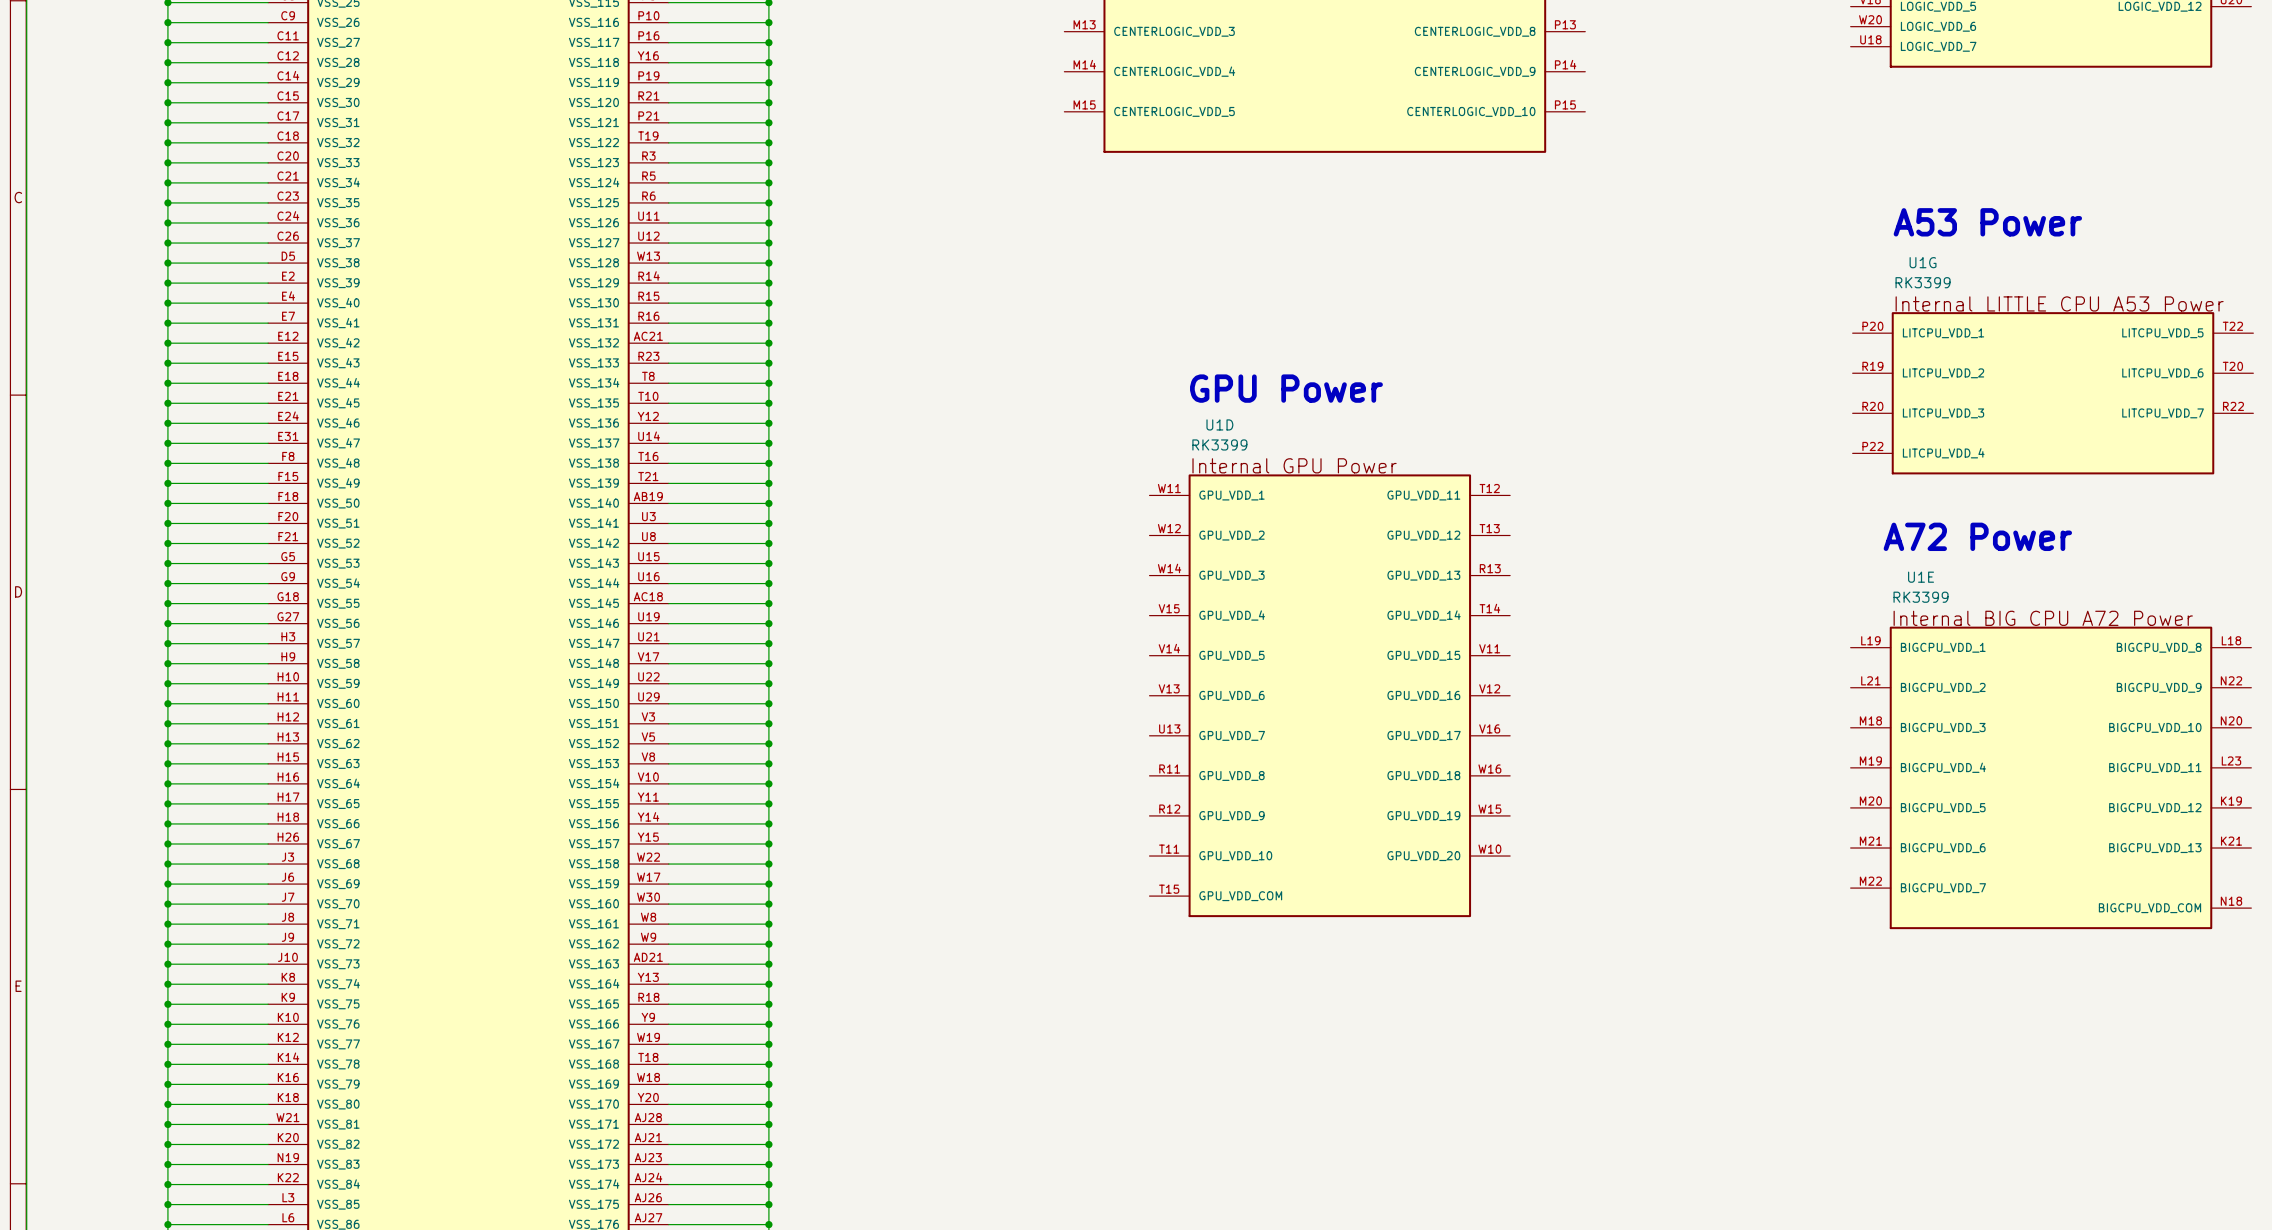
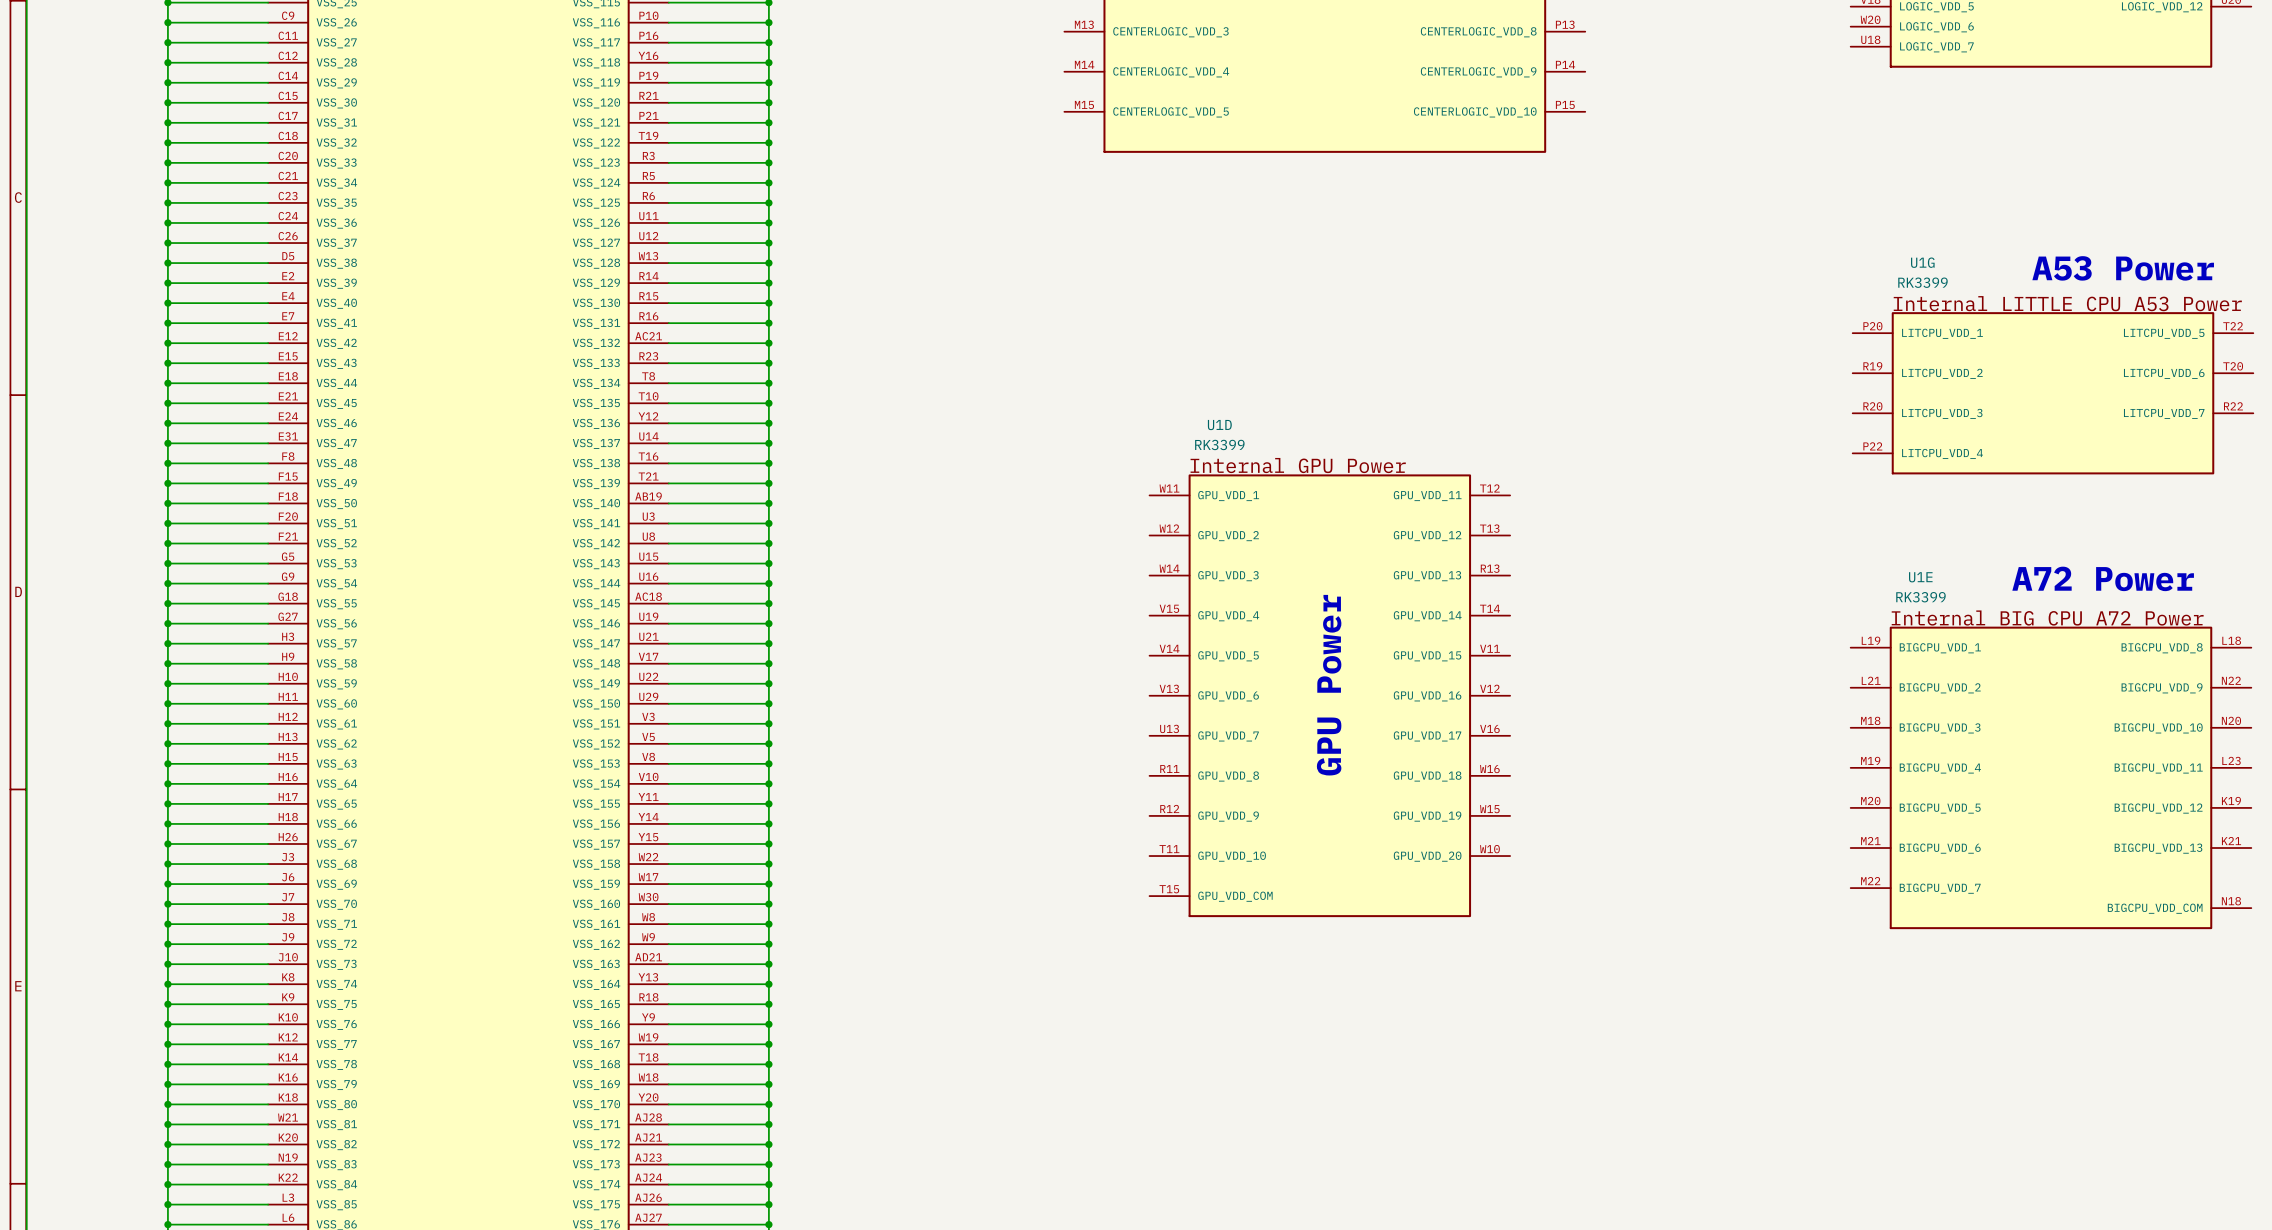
text position: A53 Power (1987, 222) -> A53 Power (2123, 268)
text rotation: 0° (1286, 388) -> 90° counterclockwise (1329, 685)
text position: GPU Power (1286, 388) -> GPU Power (1329, 685)
text position: A72 Power (1977, 536) -> A72 Power (2103, 578)

